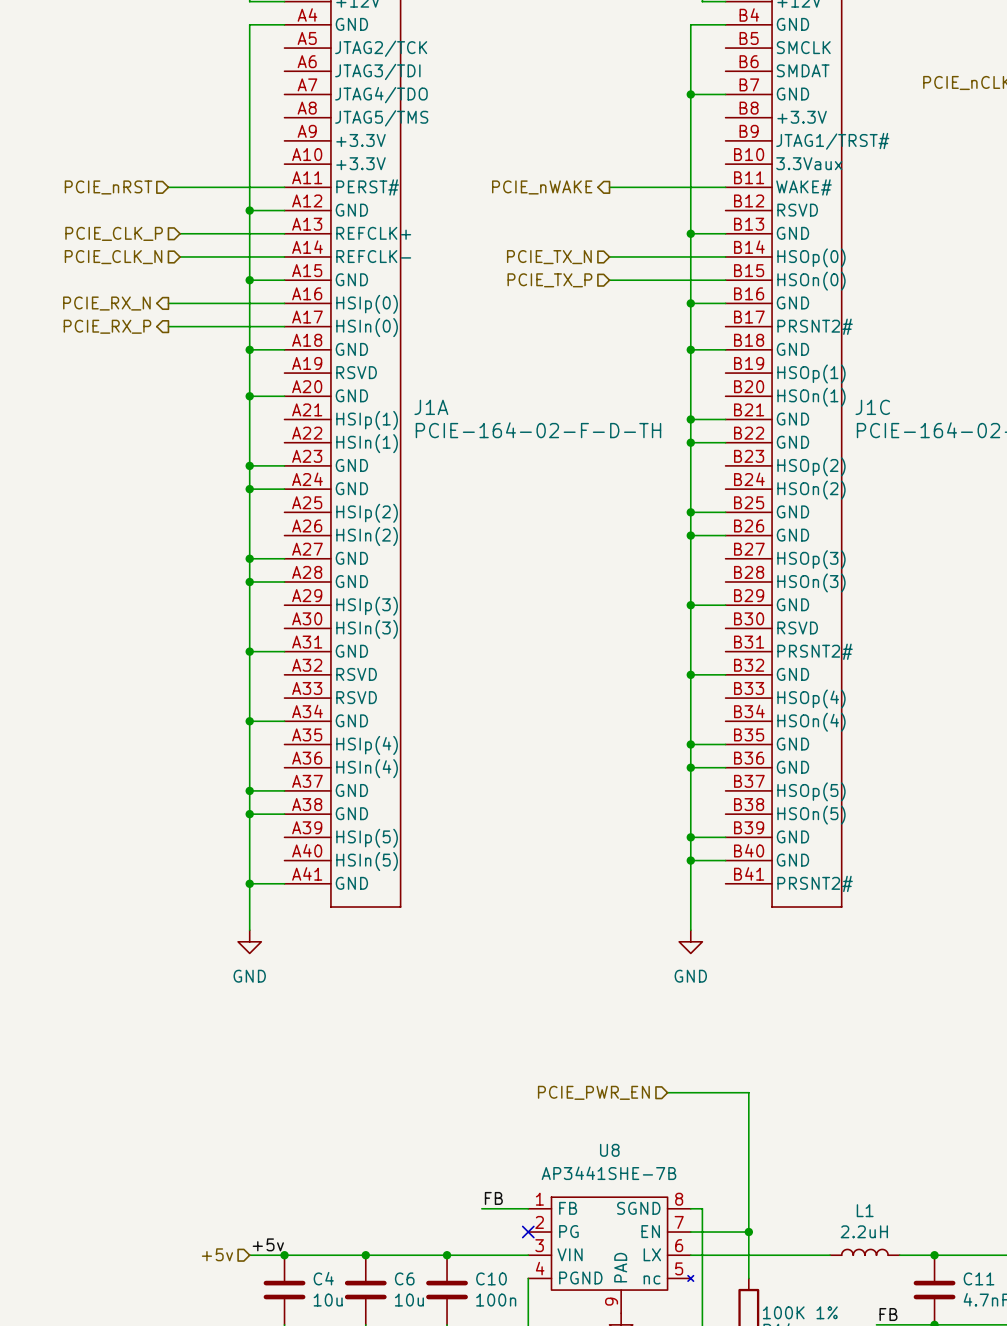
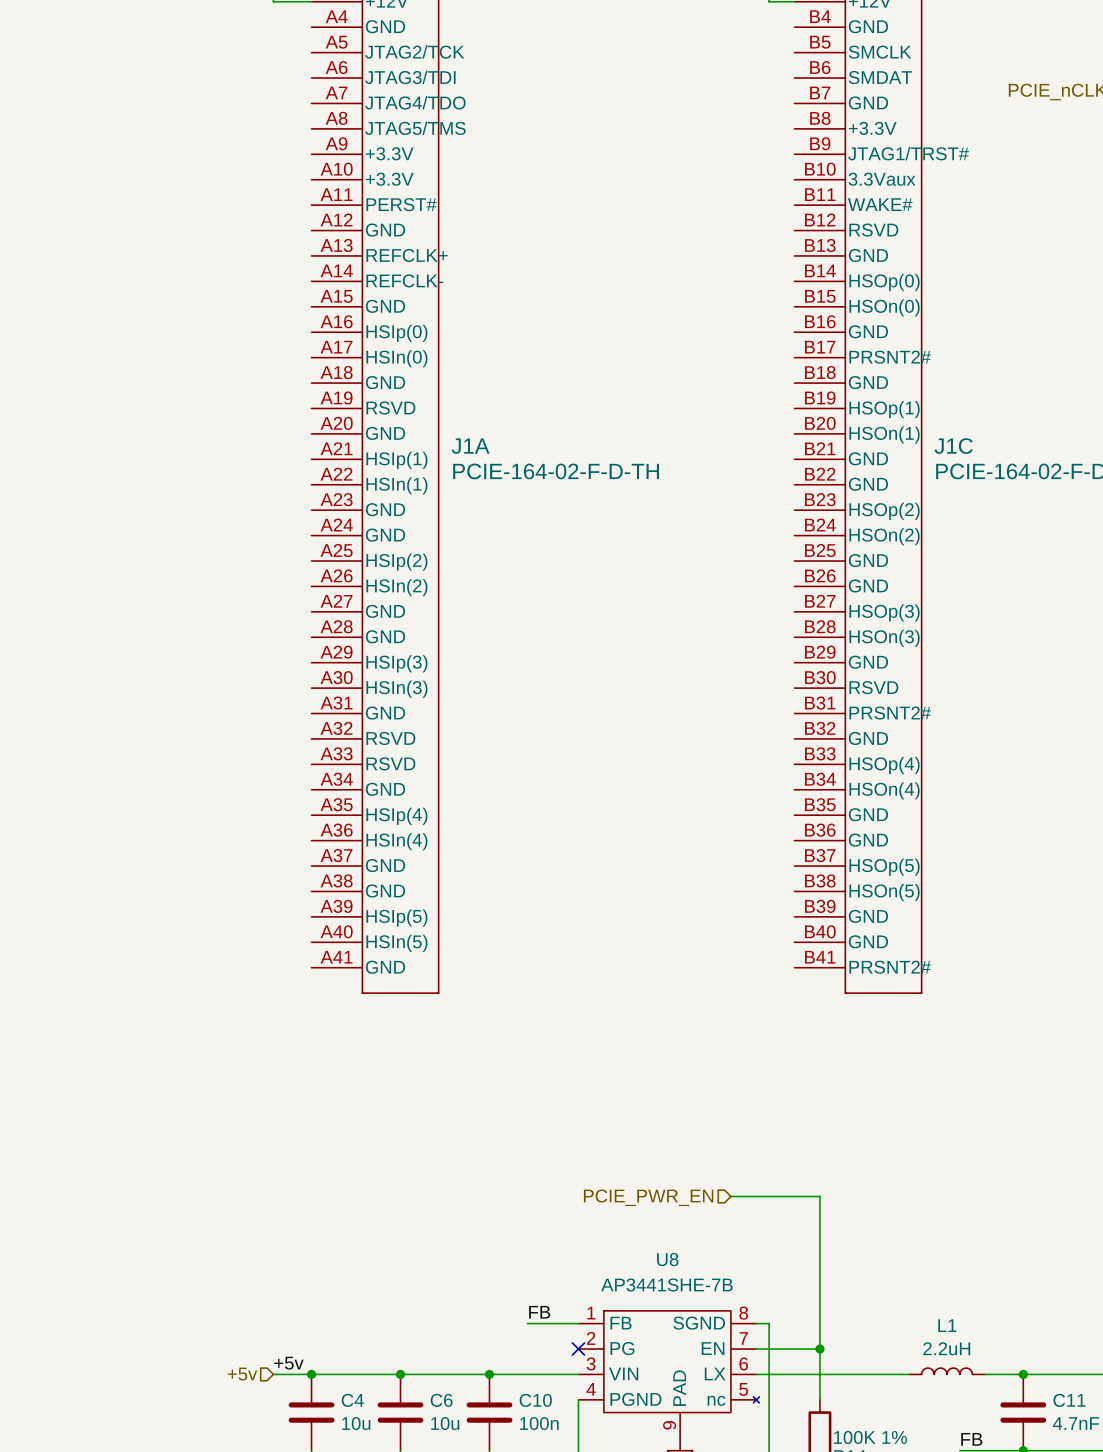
wire: (284, 24) (249, 24) (249, 930) -> none
wire: (725, 24) (690, 24) (690, 930) -> none
wire: (690, 94) (725, 94) -> none
junction: (690, 94) -> none
hierarchical label: PCIE_nRST (108, 187) -> none
wire: (168, 187) (284, 187) -> none
hierarchical label: PCIE_nWAKE (542, 187) -> none
wire: (609, 187) (725, 187) -> none
wire: (249, 210) (284, 210) -> none
junction: (249, 210) -> none
hierarchical label: PCIE_CLK_P (114, 233) -> none
wire: (180, 233) (284, 233) -> none
wire: (690, 233) (725, 233) -> none
junction: (690, 233) -> none
wire: (180, 256) (284, 256) -> none
wire: (609, 256) (725, 256) -> none
hierarchical label: PCIE_CLK_N (113, 257) -> none
hierarchical label: PCIE_TX_N (549, 257) -> none
wire: (249, 280) (284, 280) -> none
junction: (249, 280) -> none
hierarchical label: PCIE_TX_P (549, 280) -> none
wire: (609, 280) (725, 280) -> none
hierarchical label: PCIE_RX_N (106, 303) -> none
wire: (168, 303) (284, 303) -> none
wire: (690, 303) (725, 303) -> none
junction: (690, 303) -> none
hierarchical label: PCIE_RX_P (107, 326) -> none
wire: (168, 326) (284, 326) -> none
wire: (249, 349) (284, 349) -> none
junction: (249, 349) -> none
wire: (690, 349) (725, 349) -> none
junction: (690, 349) -> none
wire: (249, 396) (284, 396) -> none
junction: (249, 396) -> none
wire: (690, 419) (725, 419) -> none
junction: (690, 419) -> none
wire: (690, 442) (725, 442) -> none
junction: (690, 442) -> none
wire: (249, 465) (284, 465) -> none
junction: (249, 465) -> none
wire: (249, 489) (284, 489) -> none
junction: (249, 489) -> none
wire: (690, 512) (725, 512) -> none
junction: (690, 512) -> none
wire: (690, 535) (725, 535) -> none
junction: (690, 535) -> none
wire: (249, 558) (284, 558) -> none
junction: (249, 558) -> none
wire: (249, 581) (284, 581) -> none
junction: (249, 581) -> none
wire: (690, 605) (725, 605) -> none
junction: (690, 605) -> none
wire: (249, 651) (284, 651) -> none
junction: (249, 651) -> none
wire: (690, 674) (725, 674) -> none
junction: (690, 674) -> none
wire: (249, 721) (284, 721) -> none
junction: (249, 721) -> none
wire: (690, 744) (725, 744) -> none
junction: (690, 744) -> none
wire: (690, 767) (725, 767) -> none
junction: (690, 767) -> none
wire: (249, 790) (284, 790) -> none
junction: (249, 790) -> none
wire: (249, 814) (284, 814) -> none
junction: (249, 814) -> none
wire: (690, 837) (725, 837) -> none
junction: (690, 837) -> none
wire: (690, 860) (725, 860) -> none
junction: (690, 860) -> none
wire: (249, 883) (284, 883) -> none
junction: (249, 883) -> none
power symbol: GND (249, 941) -> none
power symbol: GND (690, 941) -> none

